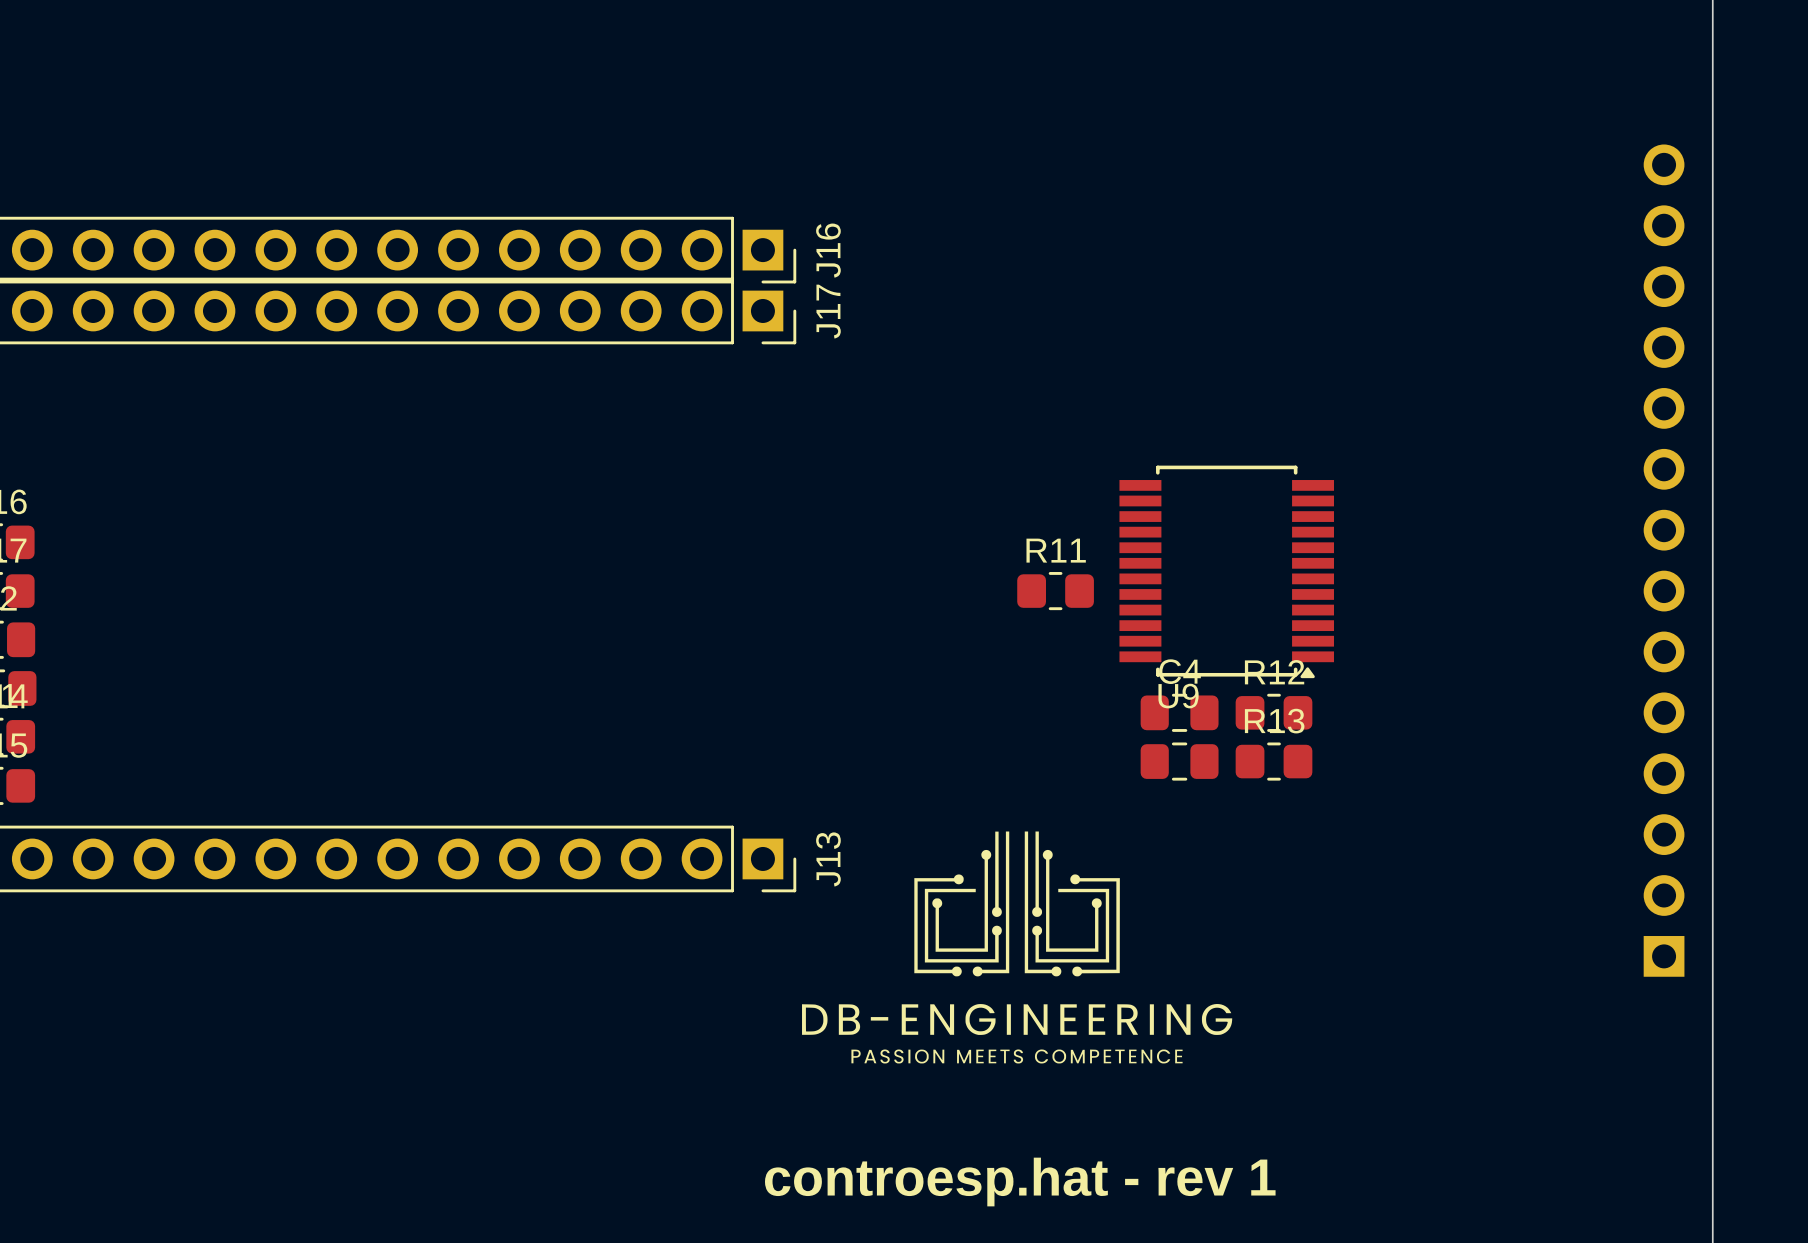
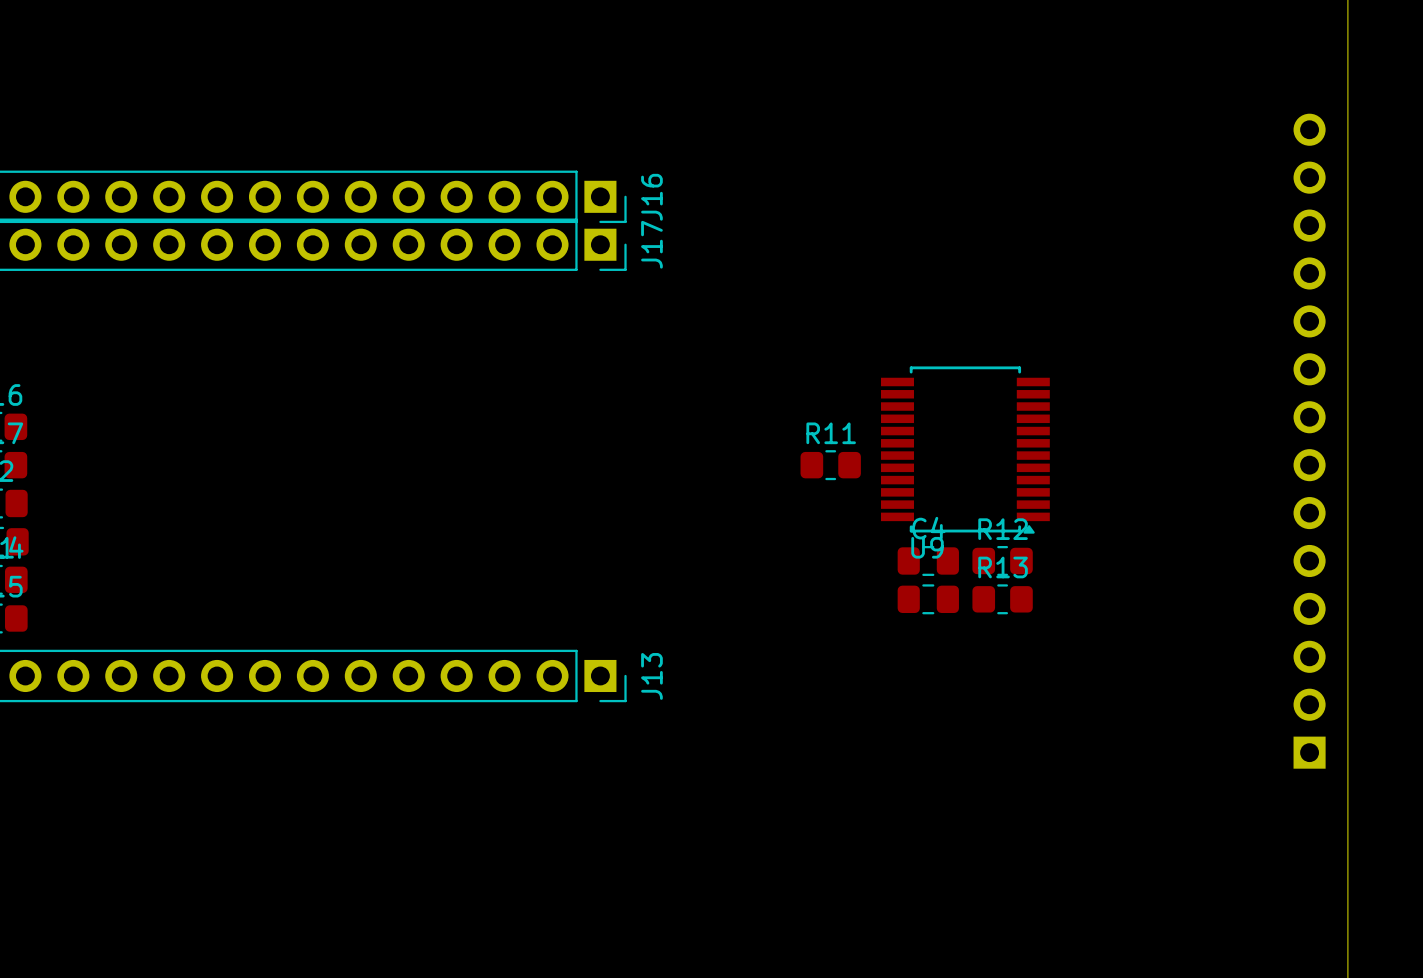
drawing: [802, 831, 1233, 1064] -> none
text: controesp.hat - rev 1 (1020, 1182) -> none

